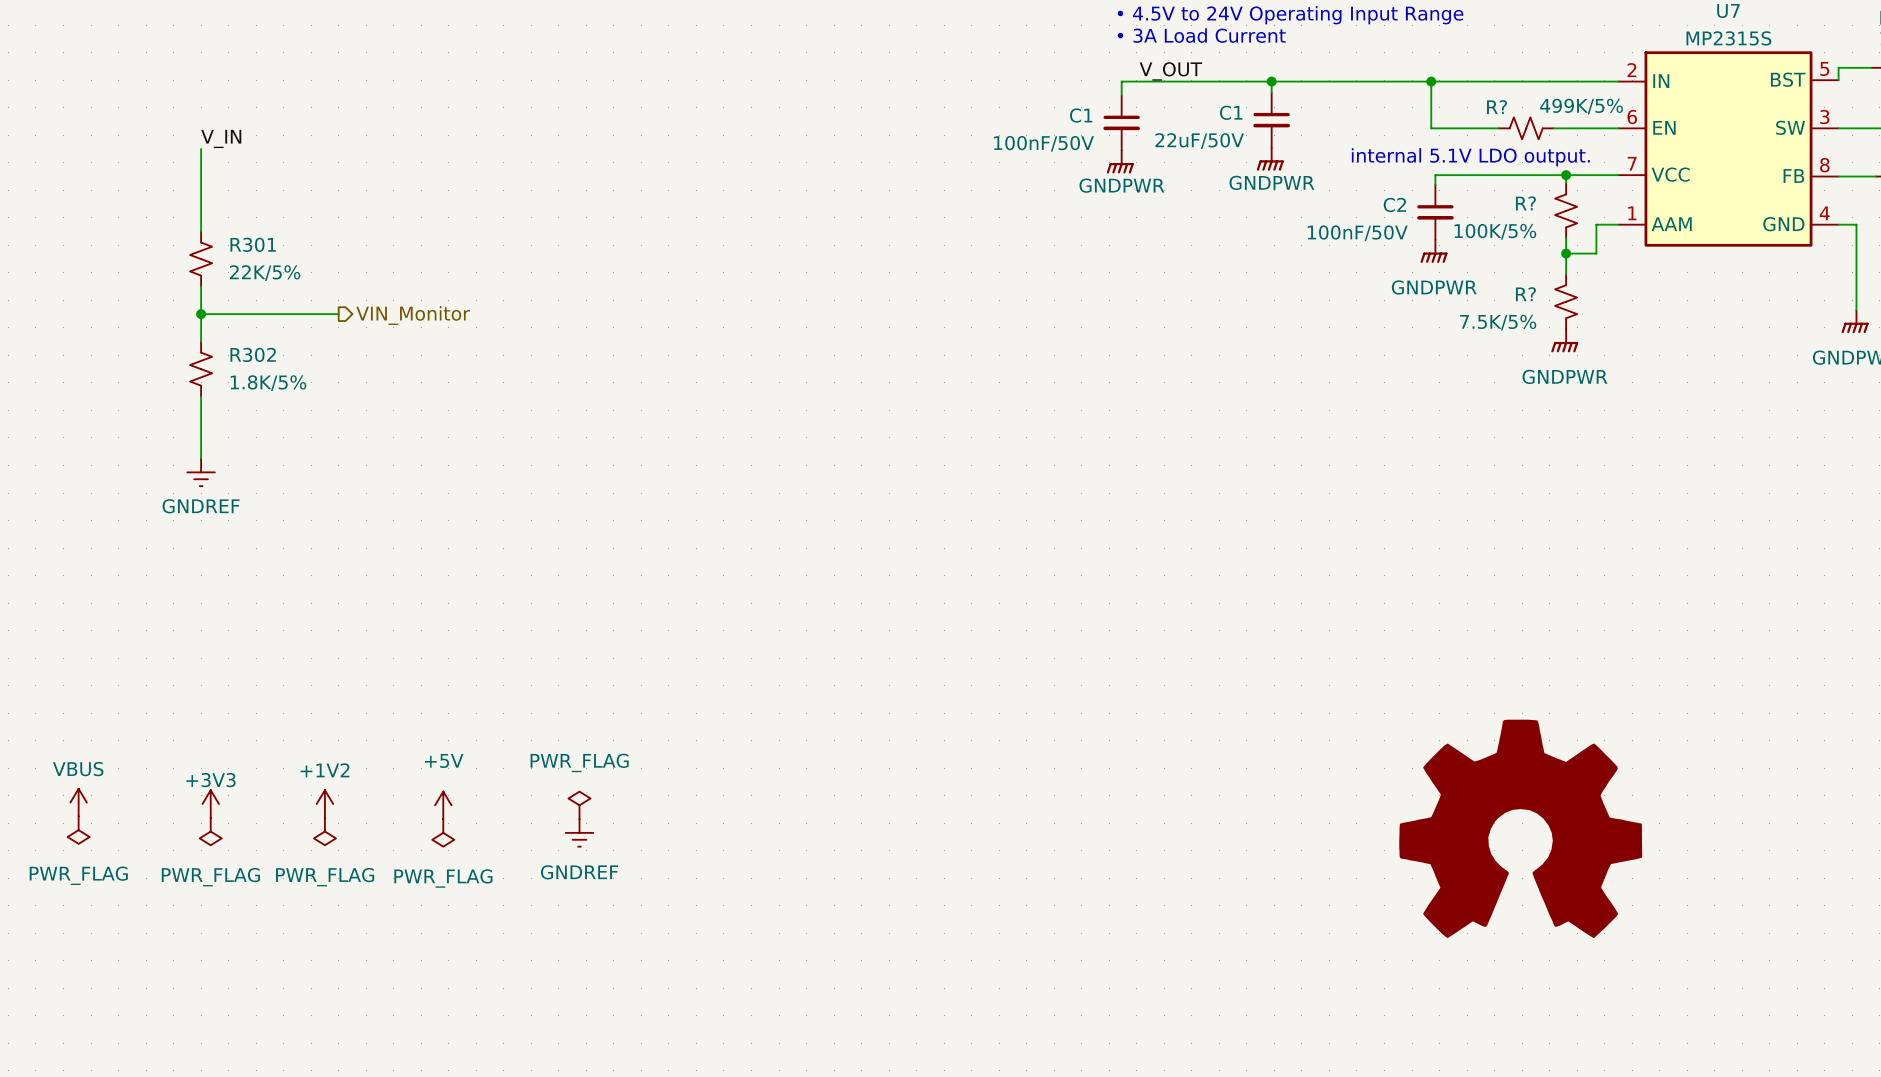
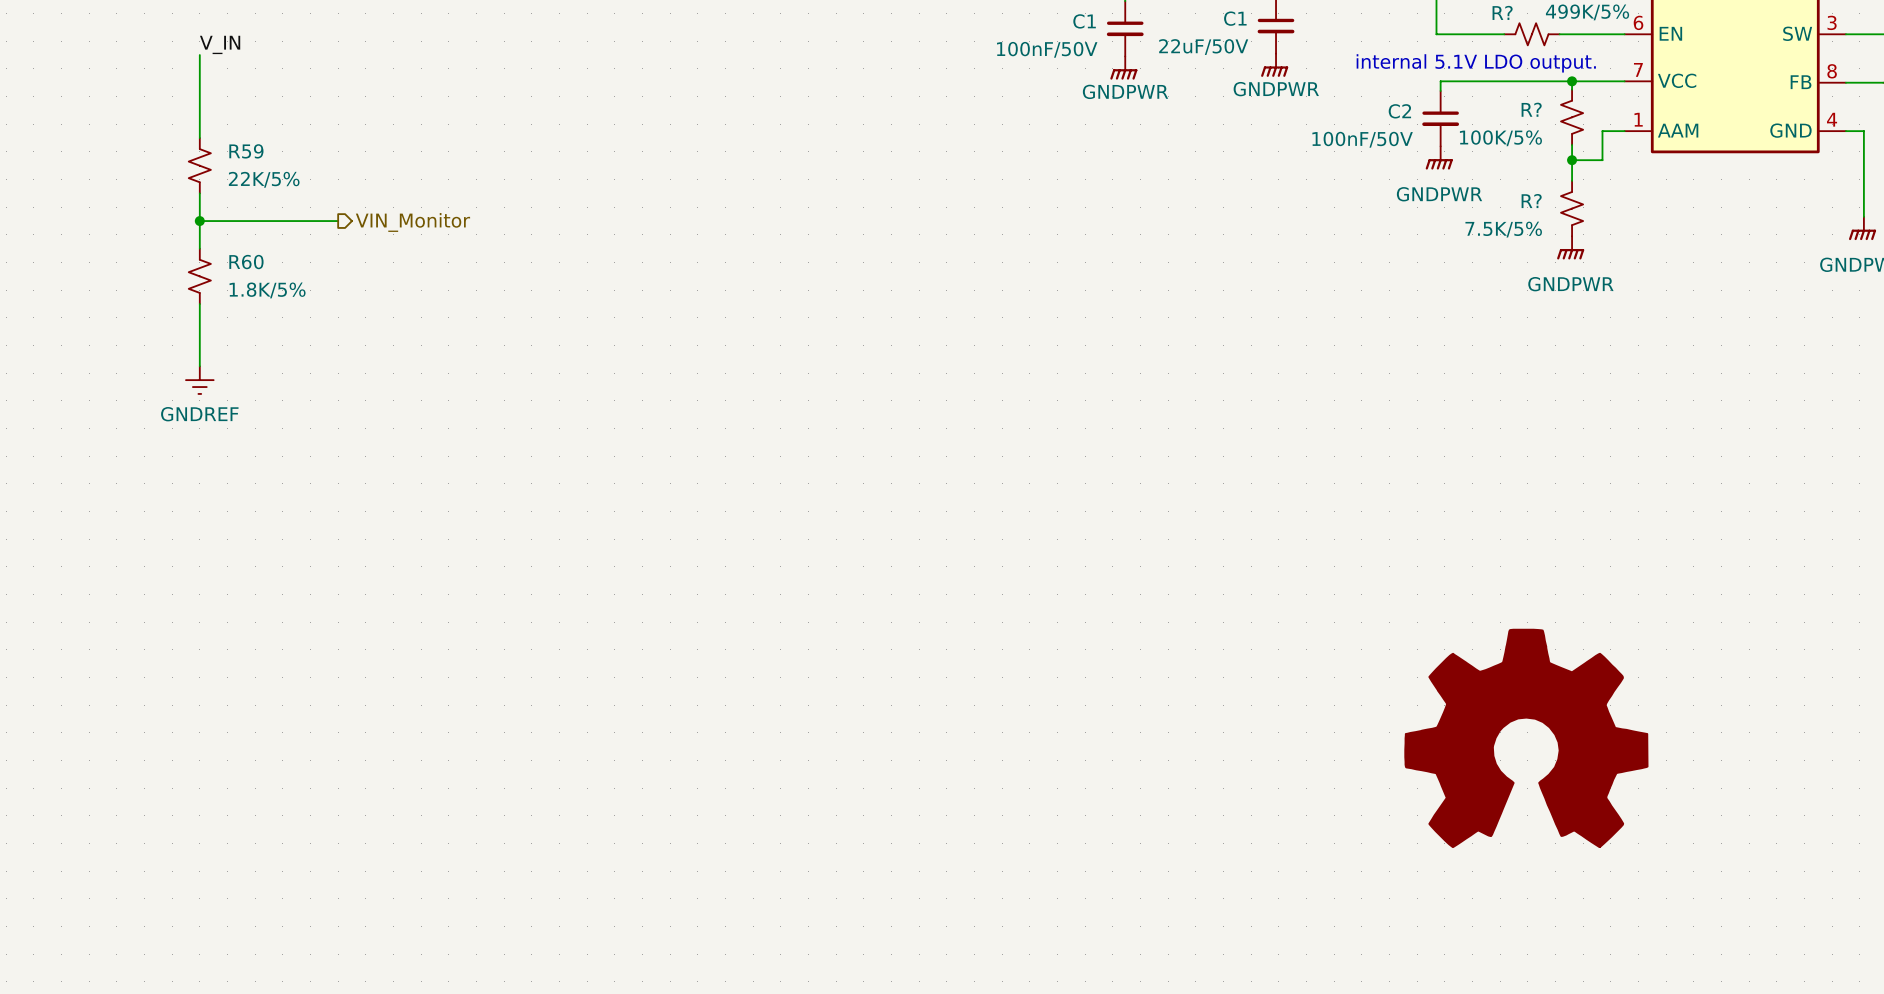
R301 name: R301 (253, 244) -> R59 (246, 151)
R302 name: R302 (253, 354) -> R60 (246, 262)
power symbol: VBUS (78, 802) -> none
power symbol: +3V3 (210, 803) -> none
power symbol: +1V2 (324, 803) -> none
power symbol: +5V (443, 805) -> none
power symbol: PWR_FLAG (579, 805) -> none
power symbol: PWR_FLAG (78, 830) -> none
power symbol: PWR_FLAG (210, 831) -> none
power symbol: PWR_FLAG (324, 831) -> none
power symbol: PWR_FLAG (443, 832) -> none
power symbol: GNDREF (579, 832) -> none

